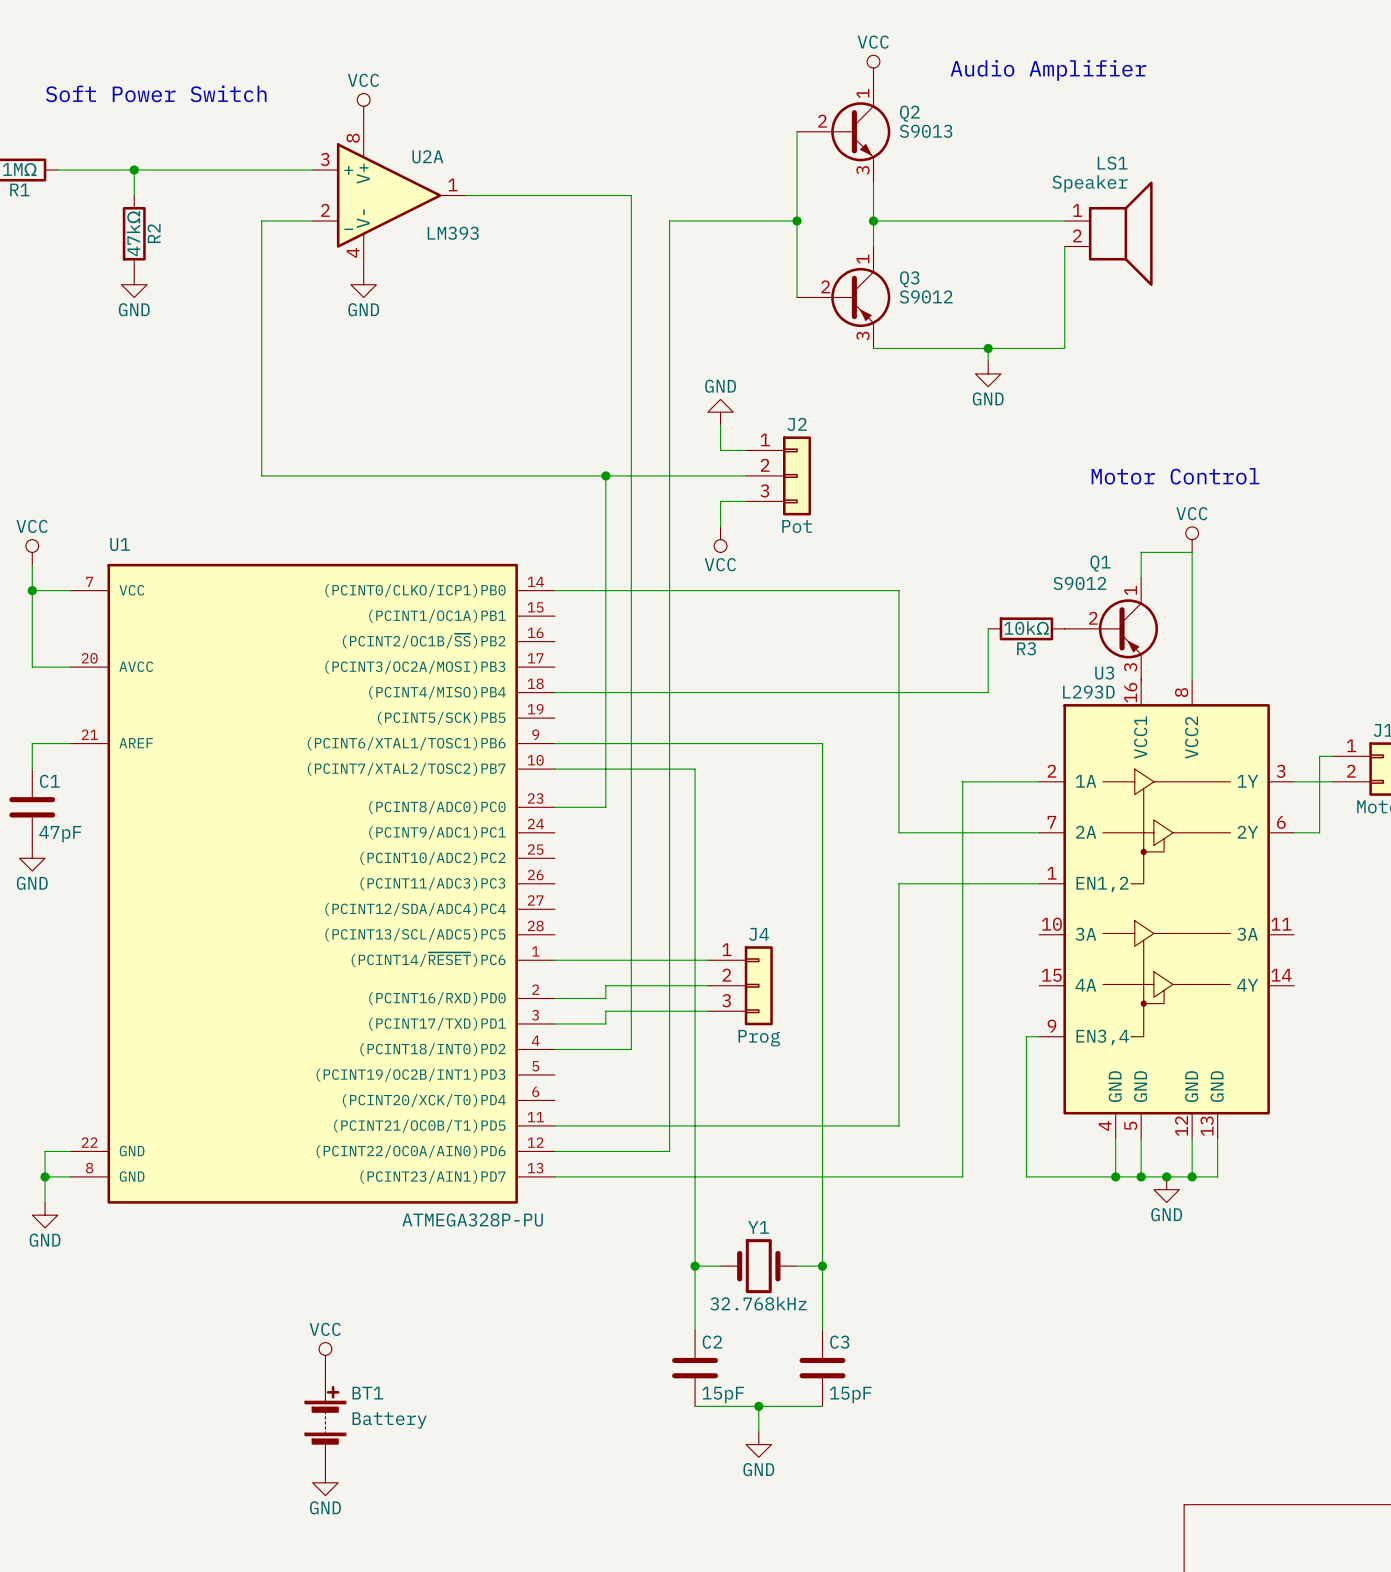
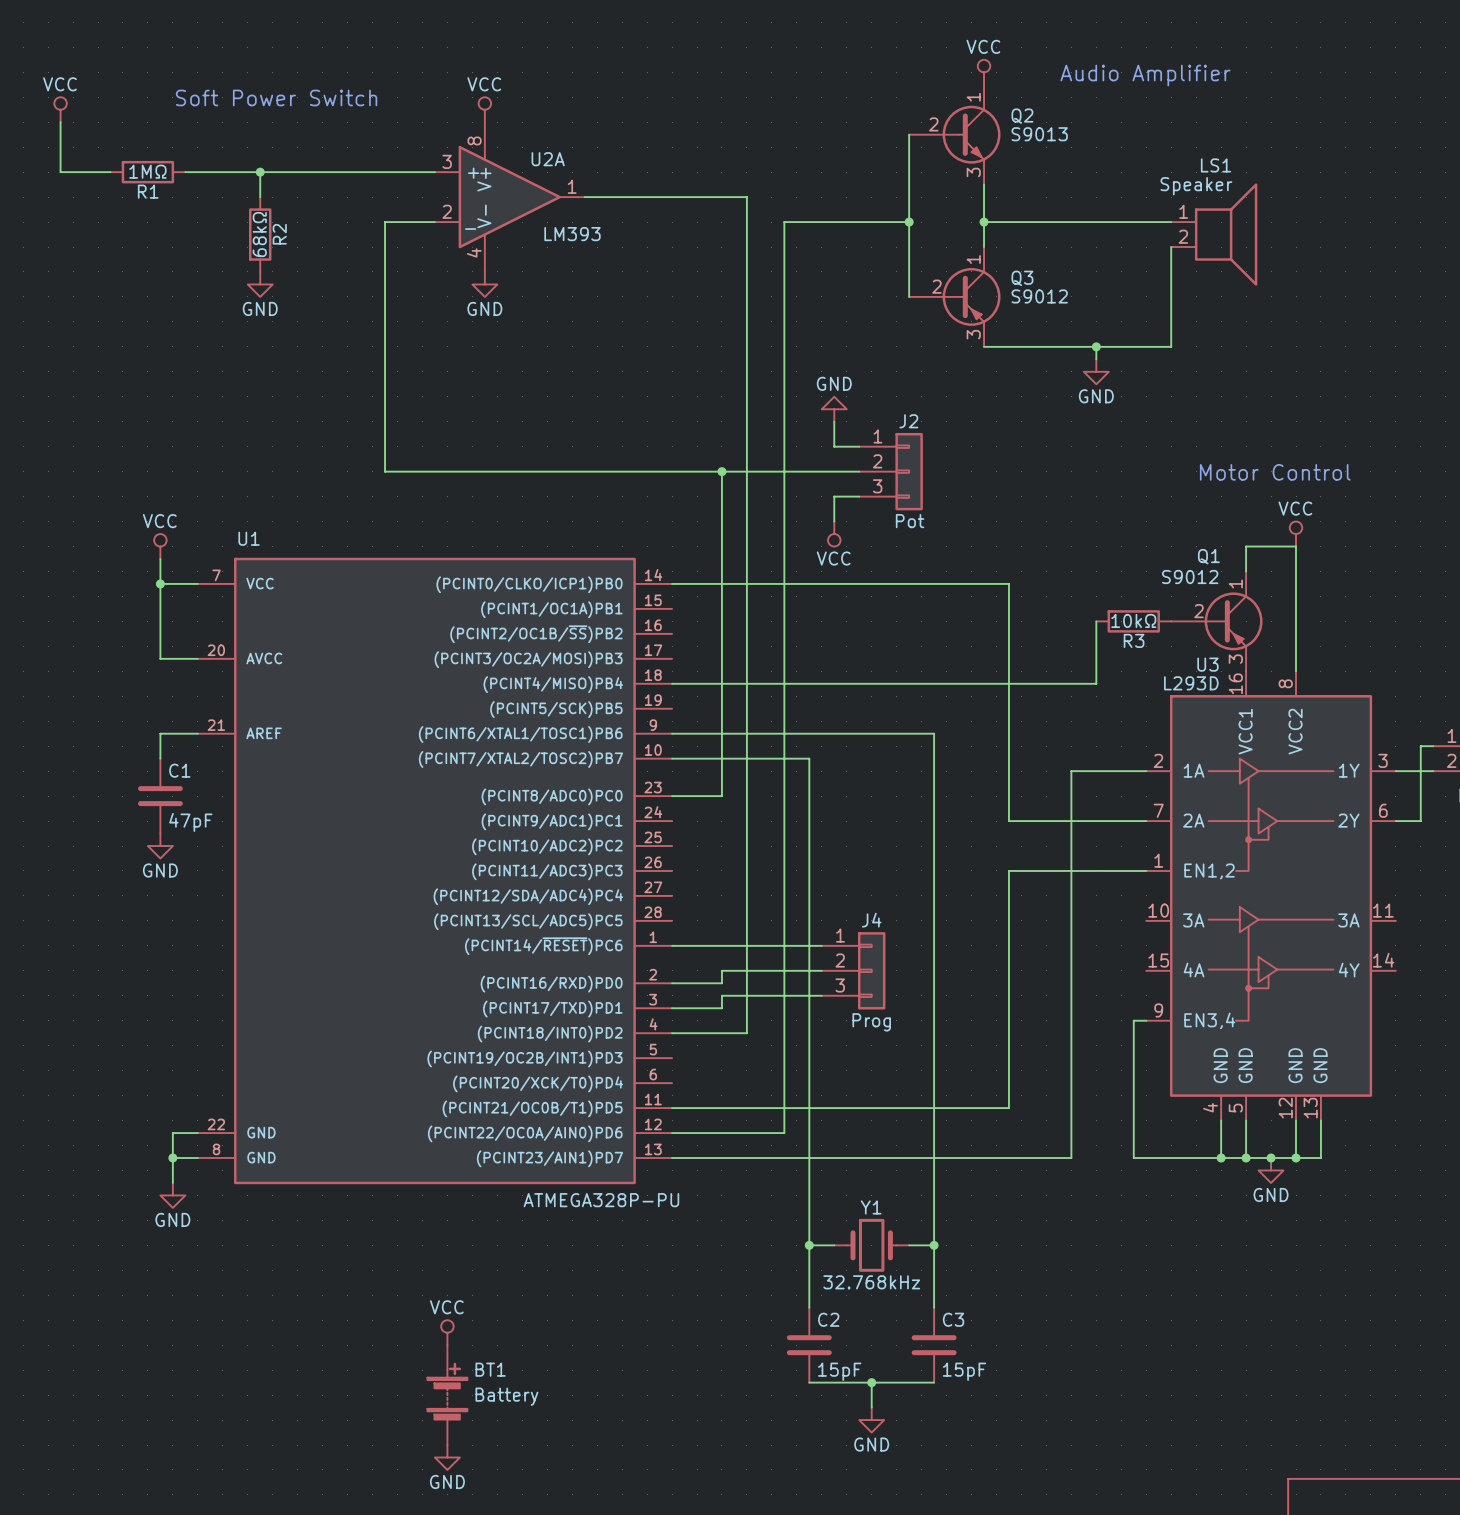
R2 value: 47kΩ (133, 233) -> 68kΩ (259, 234)

